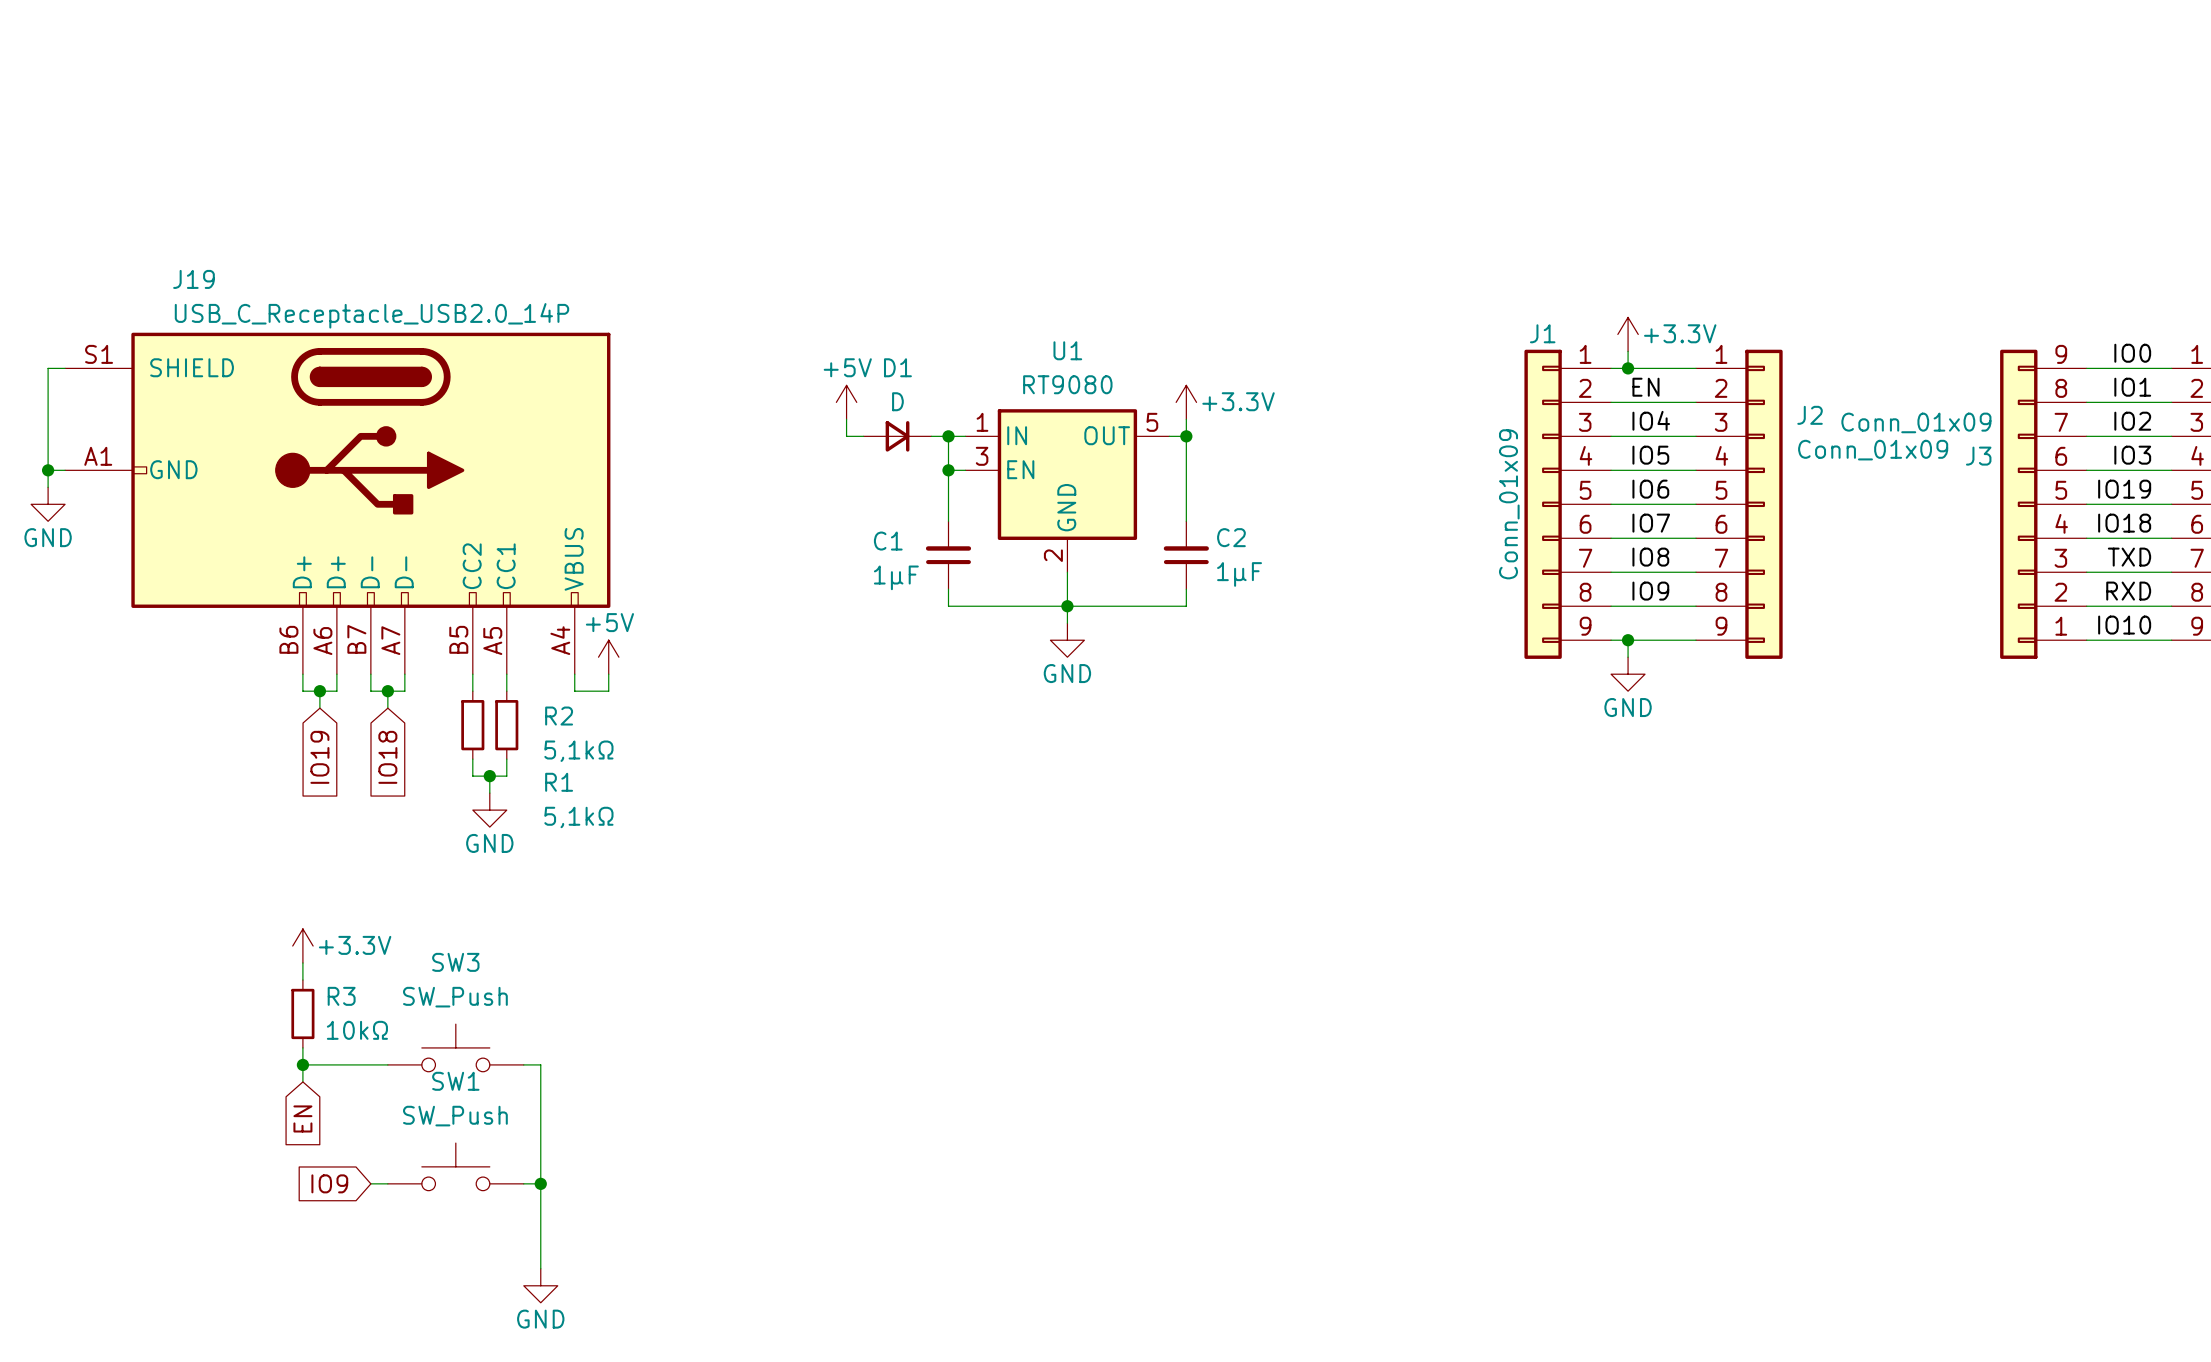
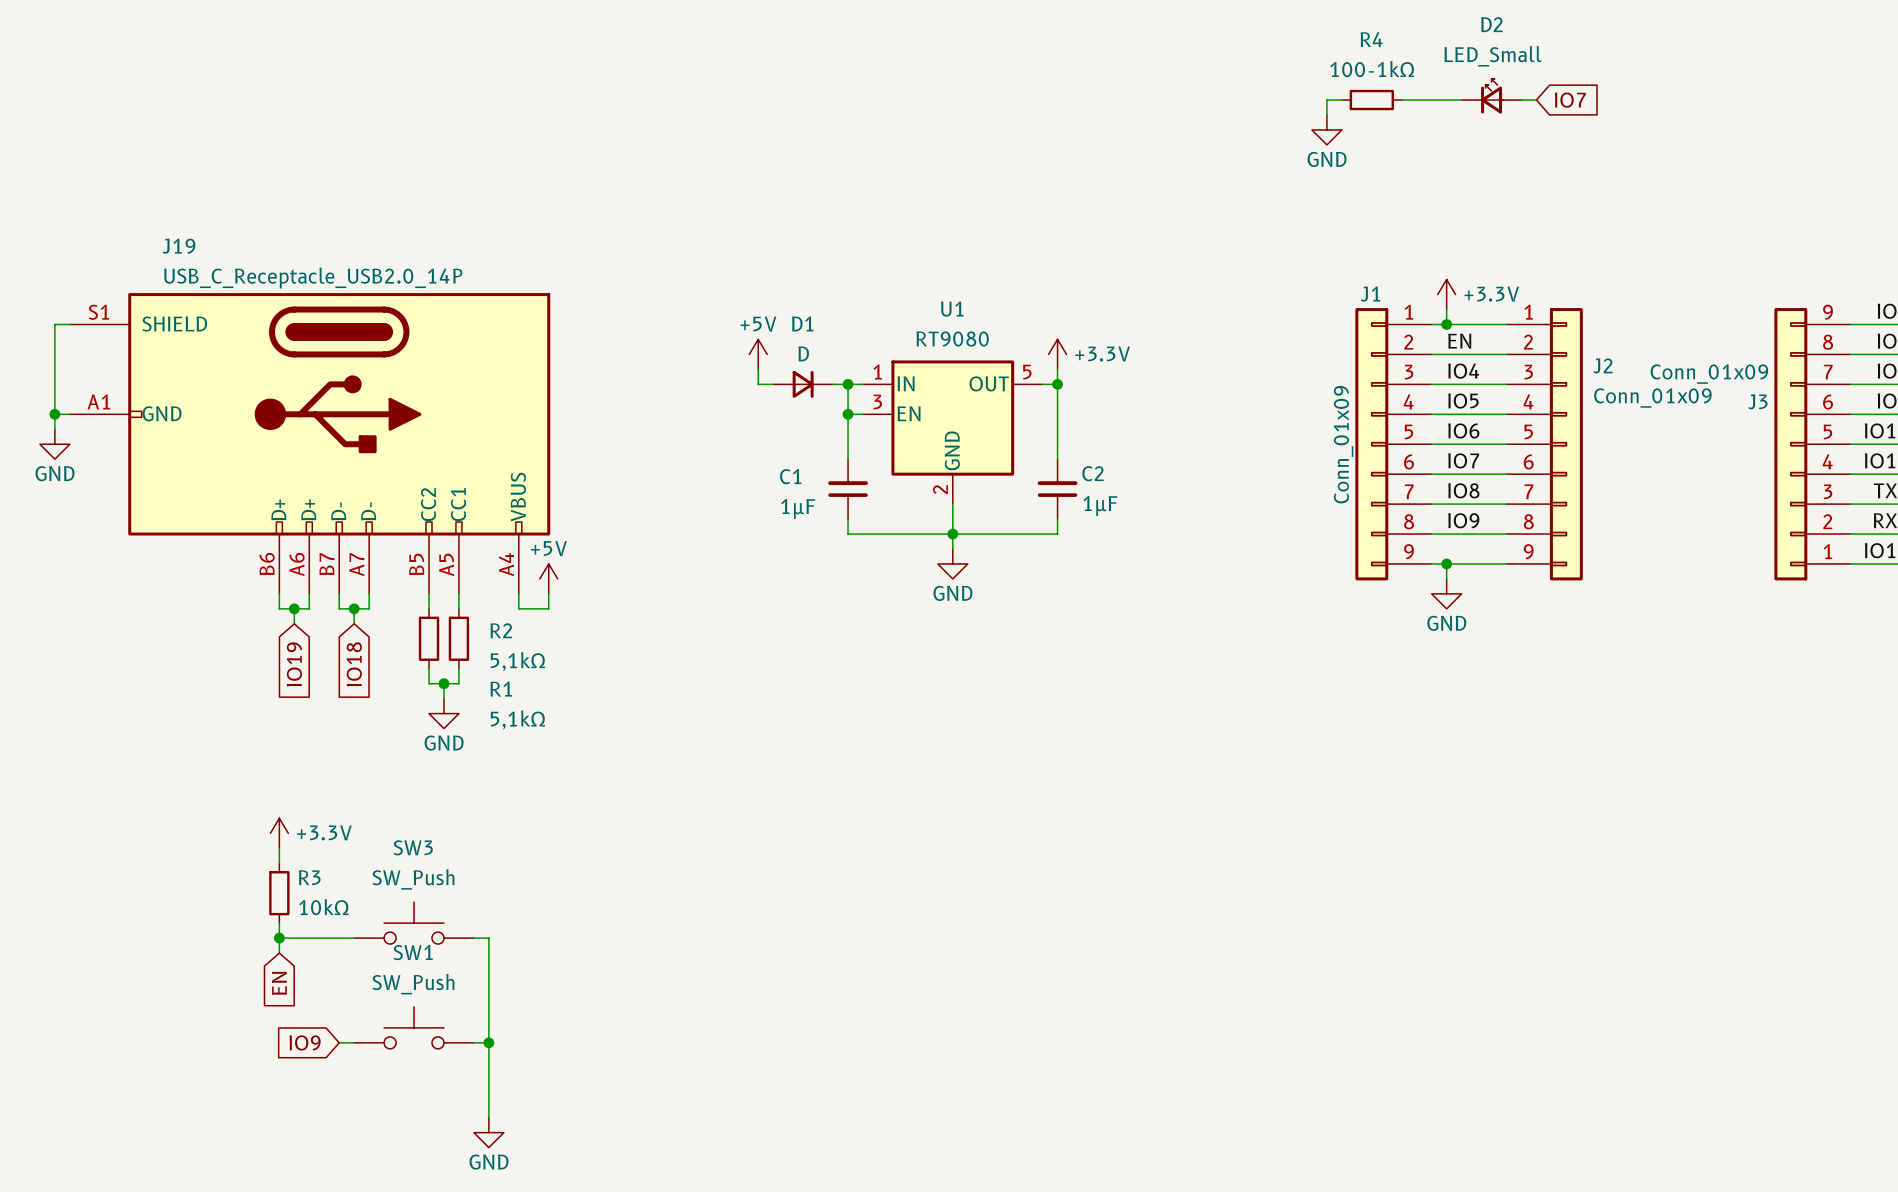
D2: none -> LED_Small (1491, 96)
wire: none -> (1341, 100) (1326, 100) (1326, 115)
R4: none -> 100-1kΩ (1371, 100)
wire: none -> (1401, 100) (1461, 100)
wire: none -> (1521, 100) (1536, 100)
global label: none -> IO7 (1570, 100)
power symbol: none -> GND (1326, 129)

